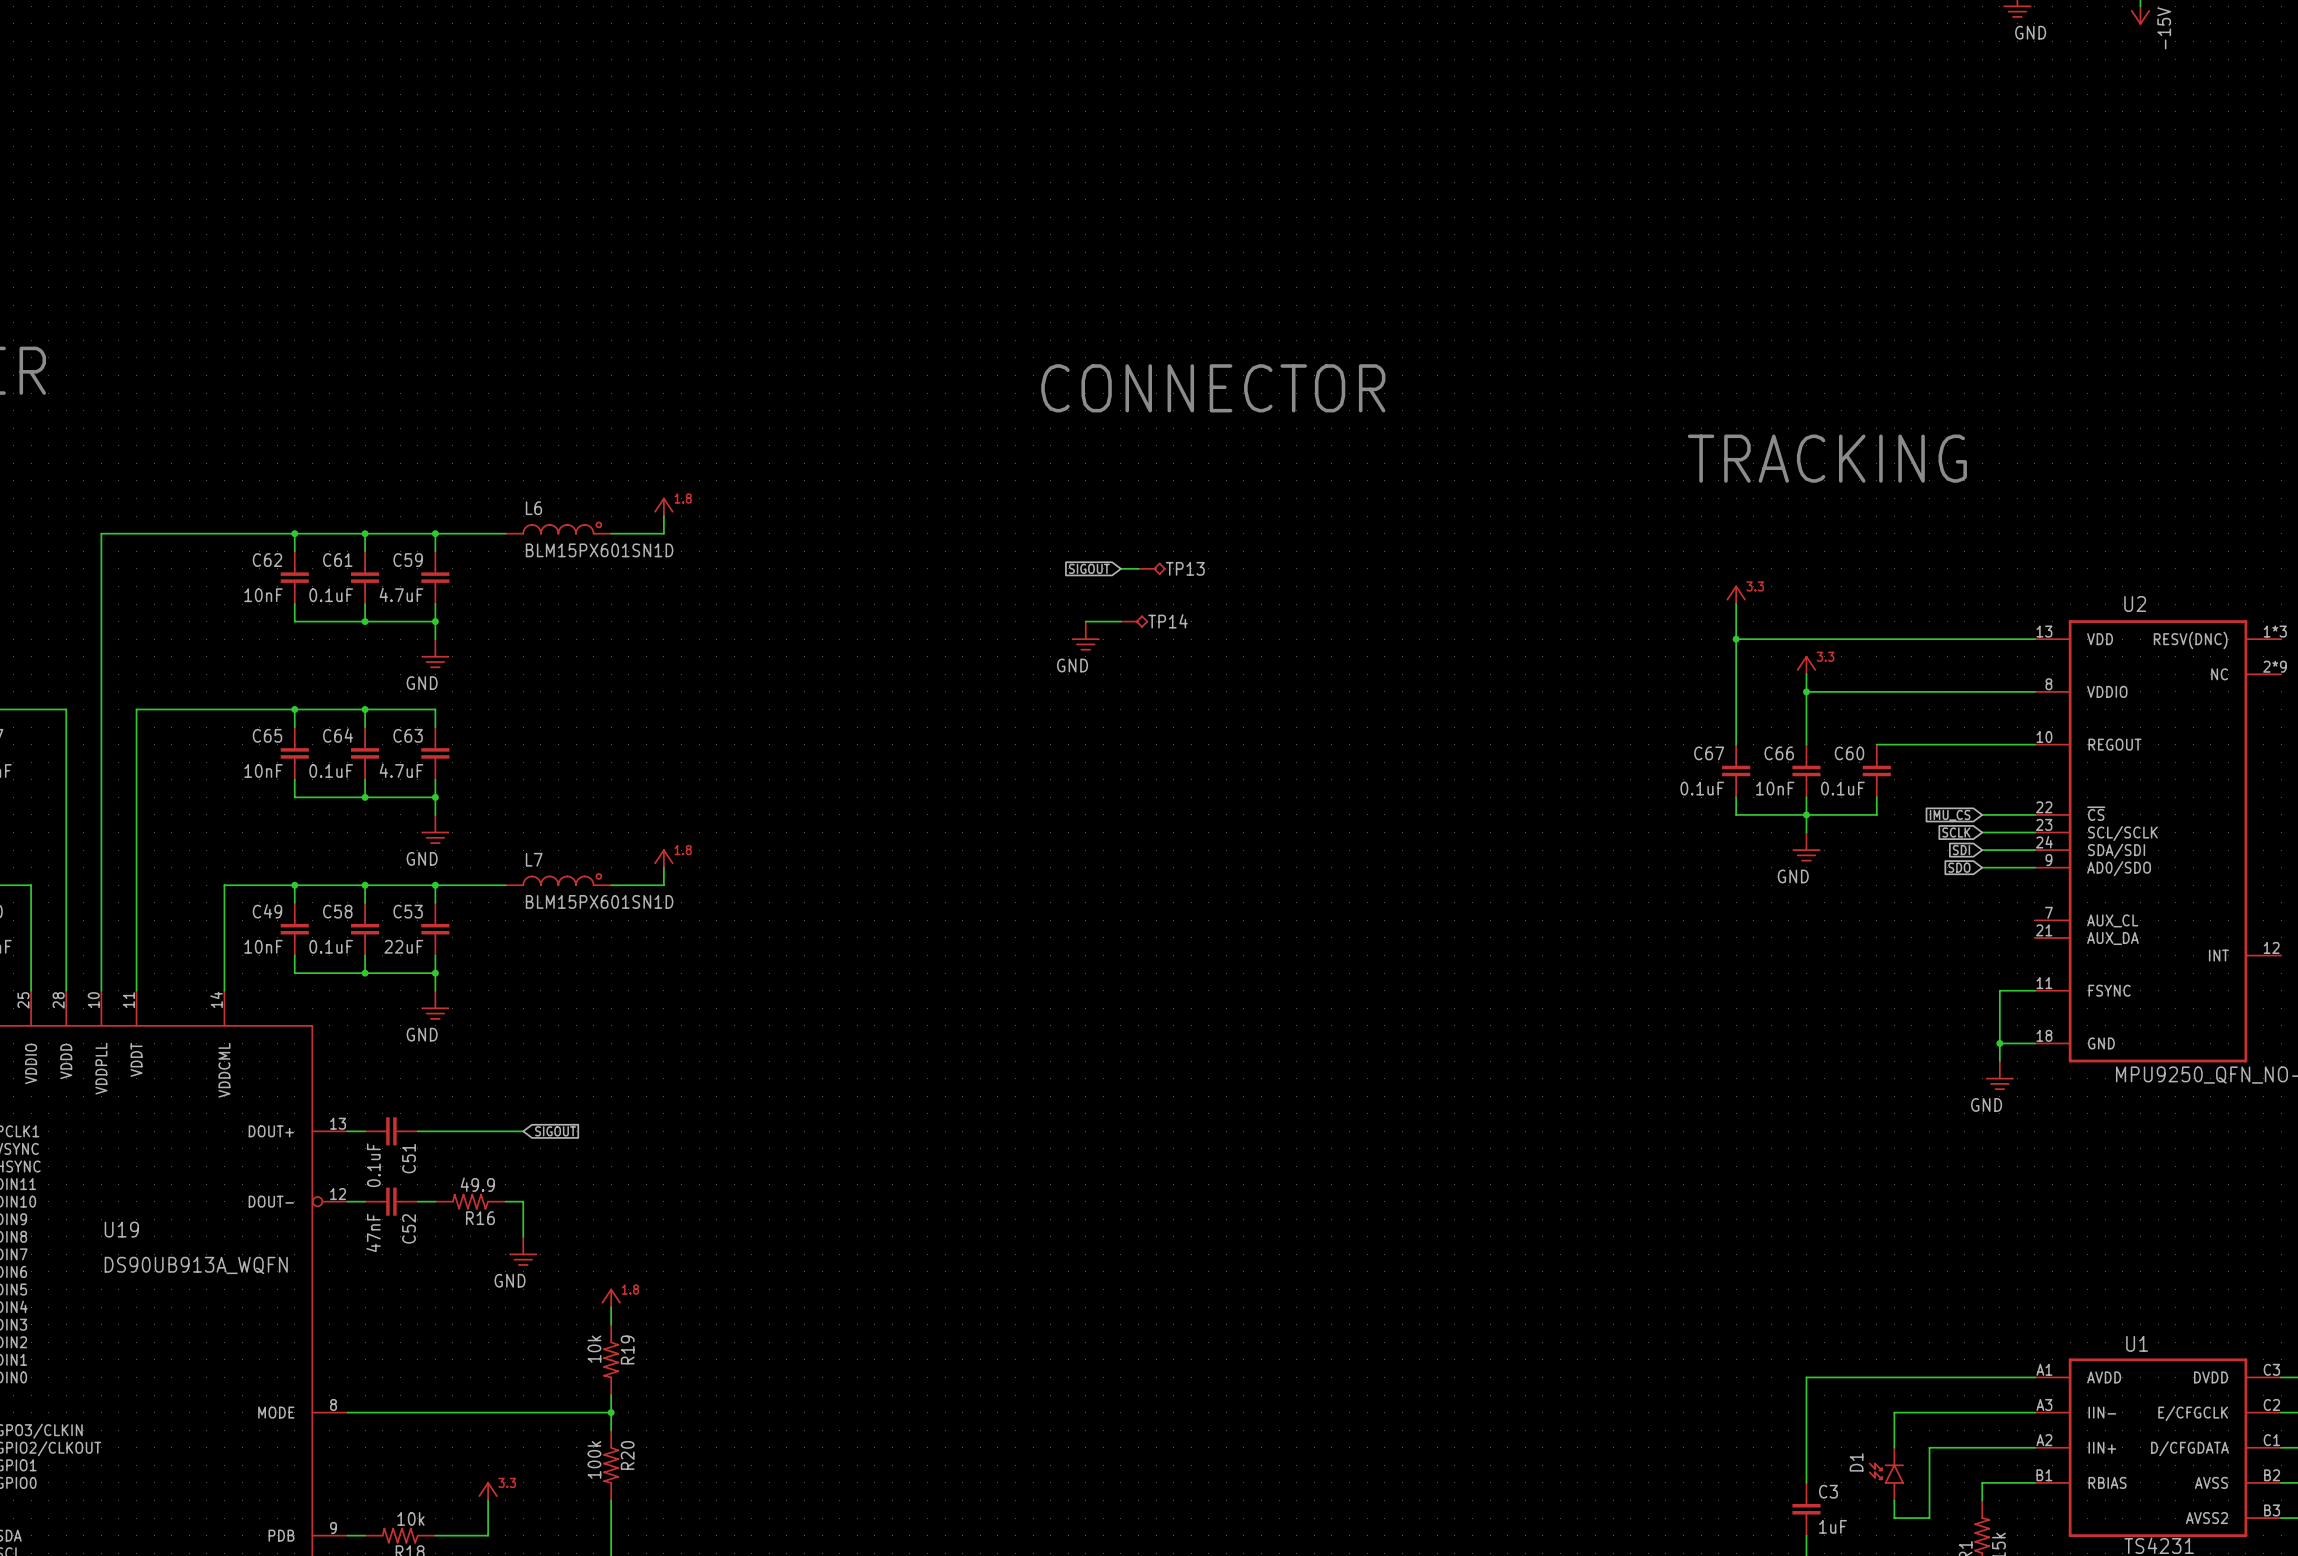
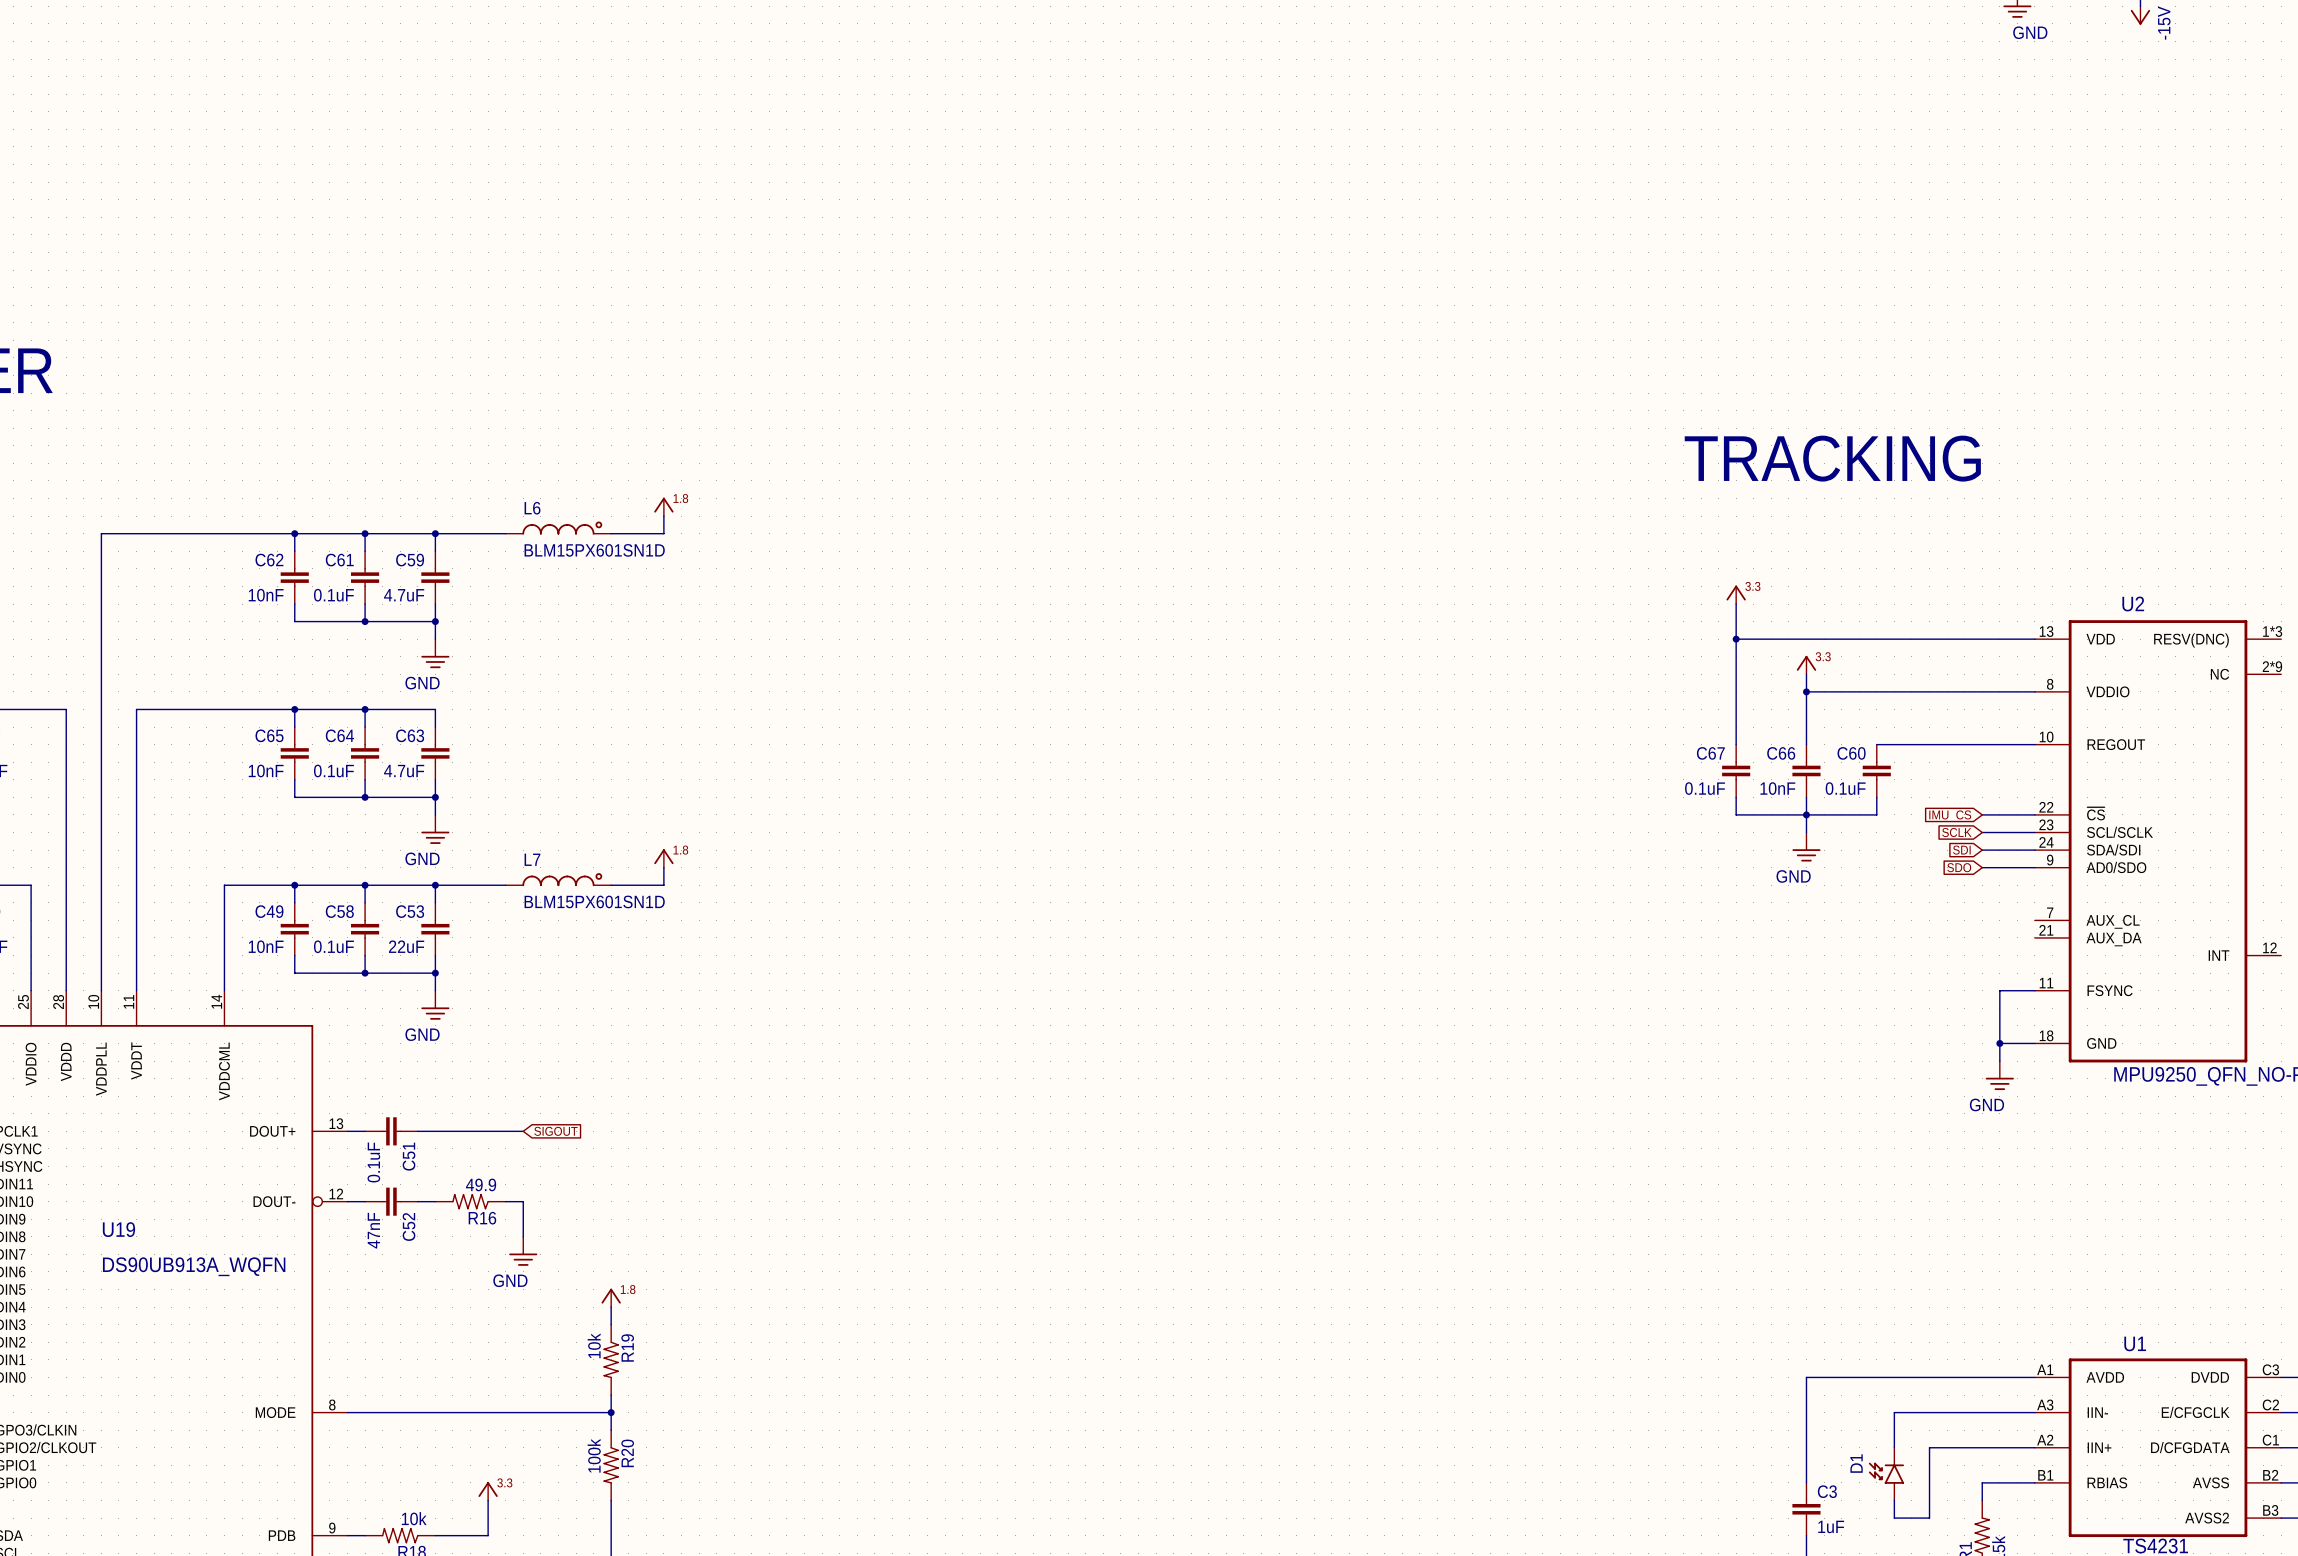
text: CONNECTOR (1213, 388) -> none
global label: SIGOUT (1089, 568) -> none
wire: (1120, 568) (1138, 568) -> none
TP13: (1152, 568) -> none
wire: (1085, 621) (1120, 621) -> none
TP14: (1134, 621) -> none
power symbol: GND (1085, 636) -> none

